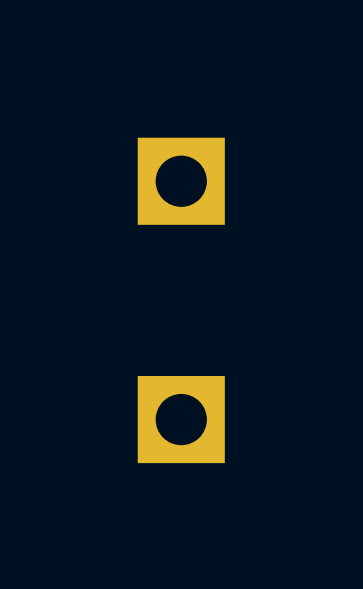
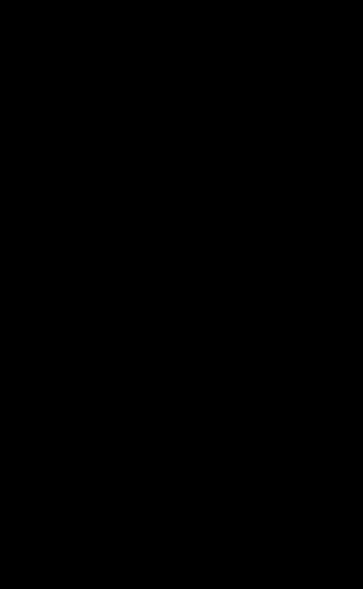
part: (181, 181) -> none
part: (181, 419) -> none

